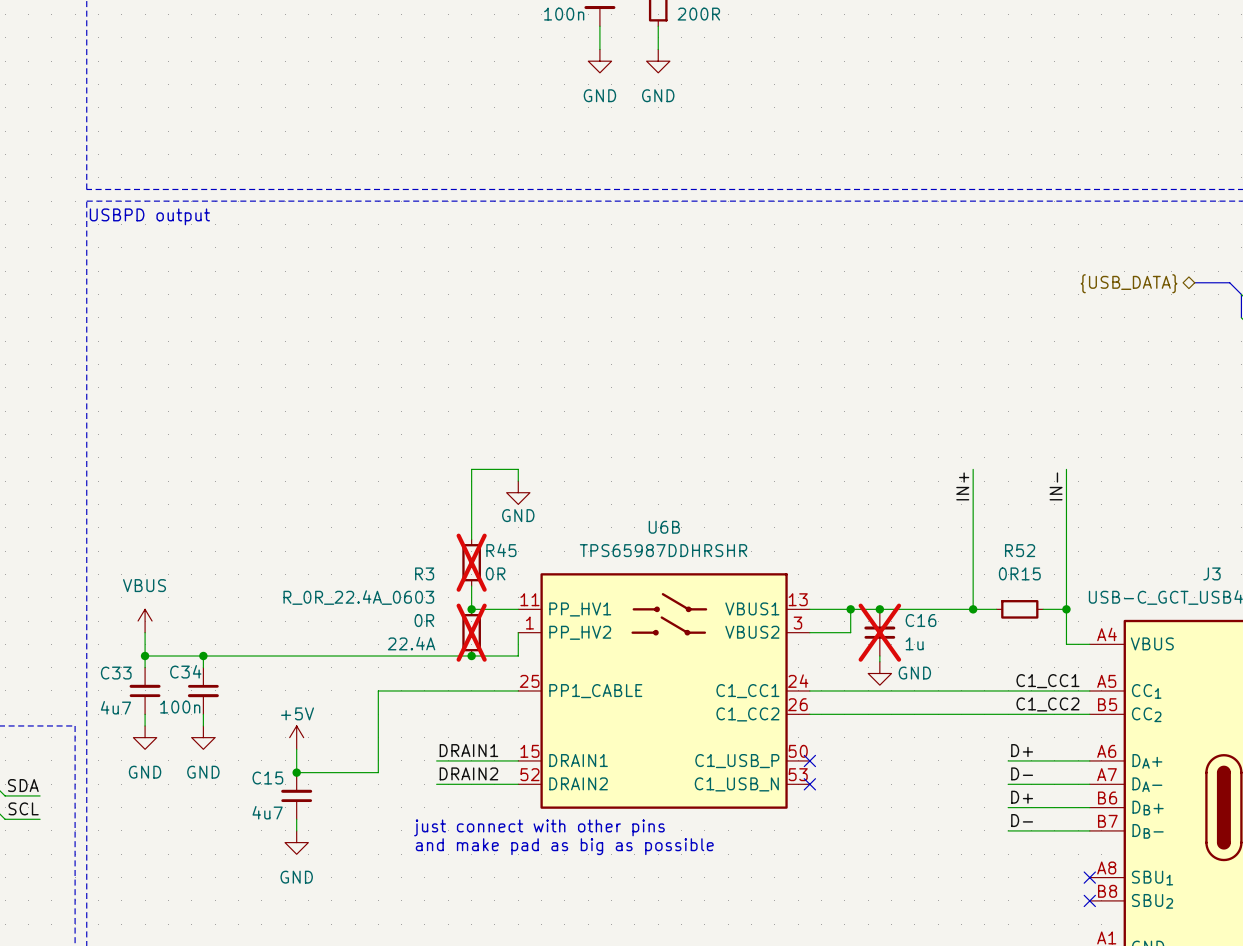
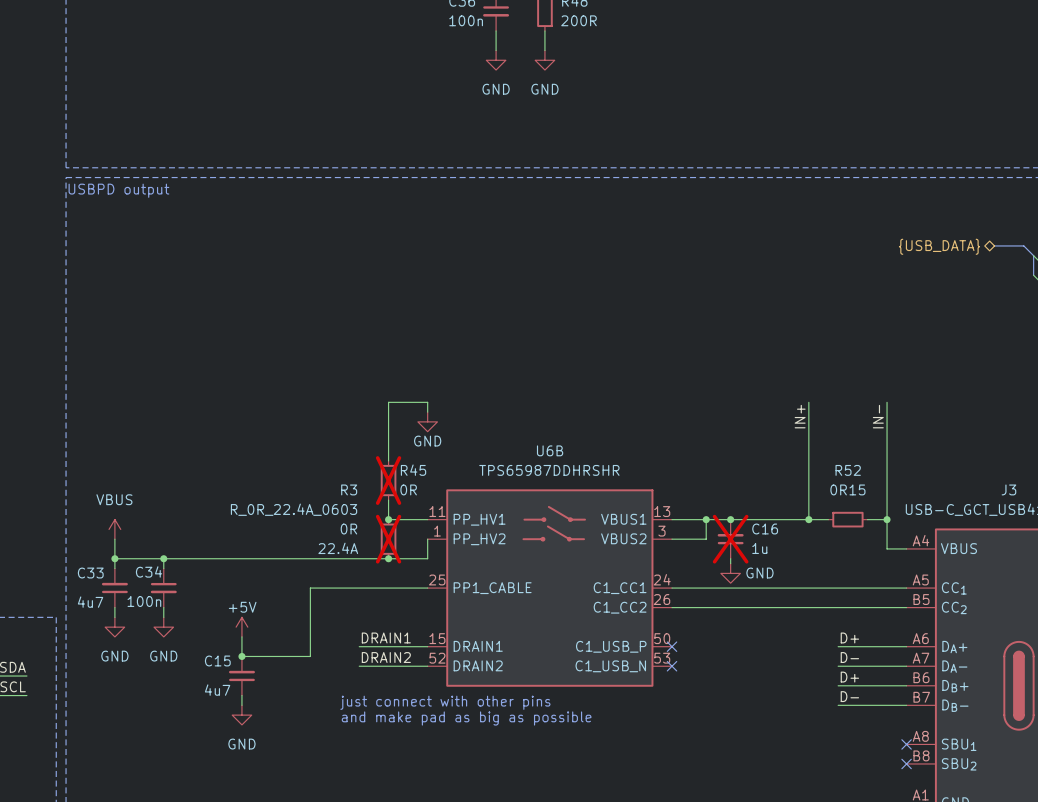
label: C1_CC1 (1047, 681) -> none
label: C1_CC2 (1047, 704) -> none

